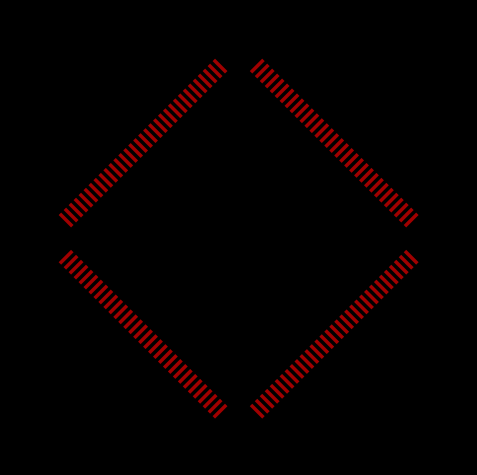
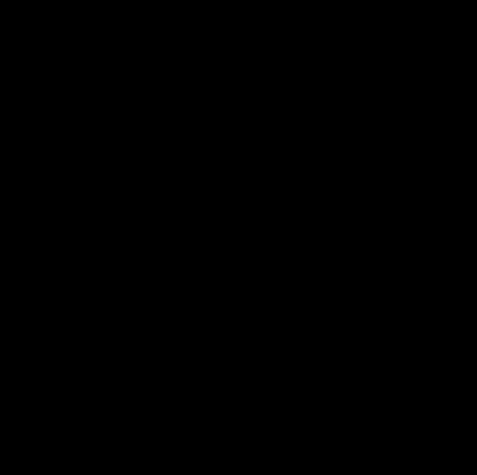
part: (238, 238) -> none

